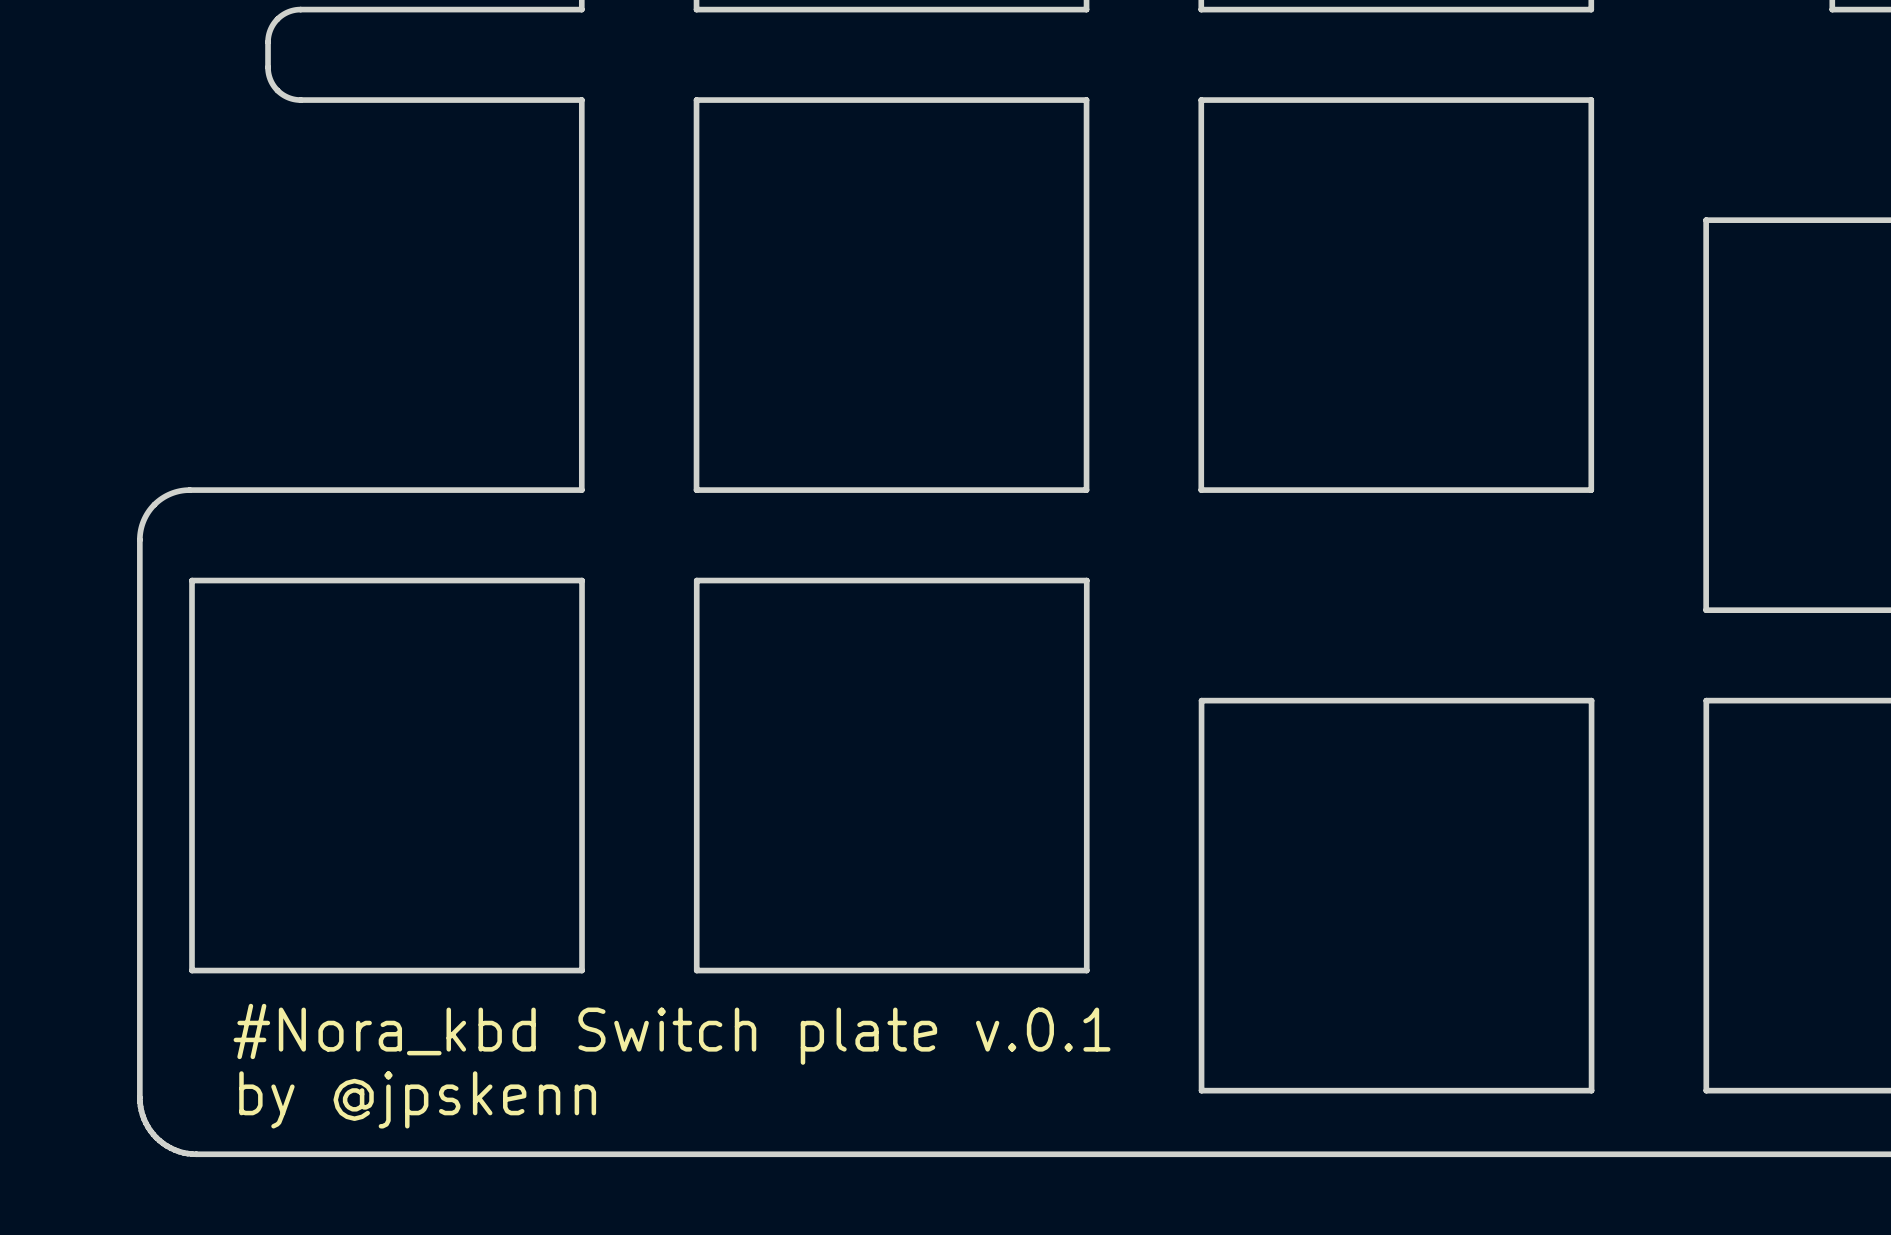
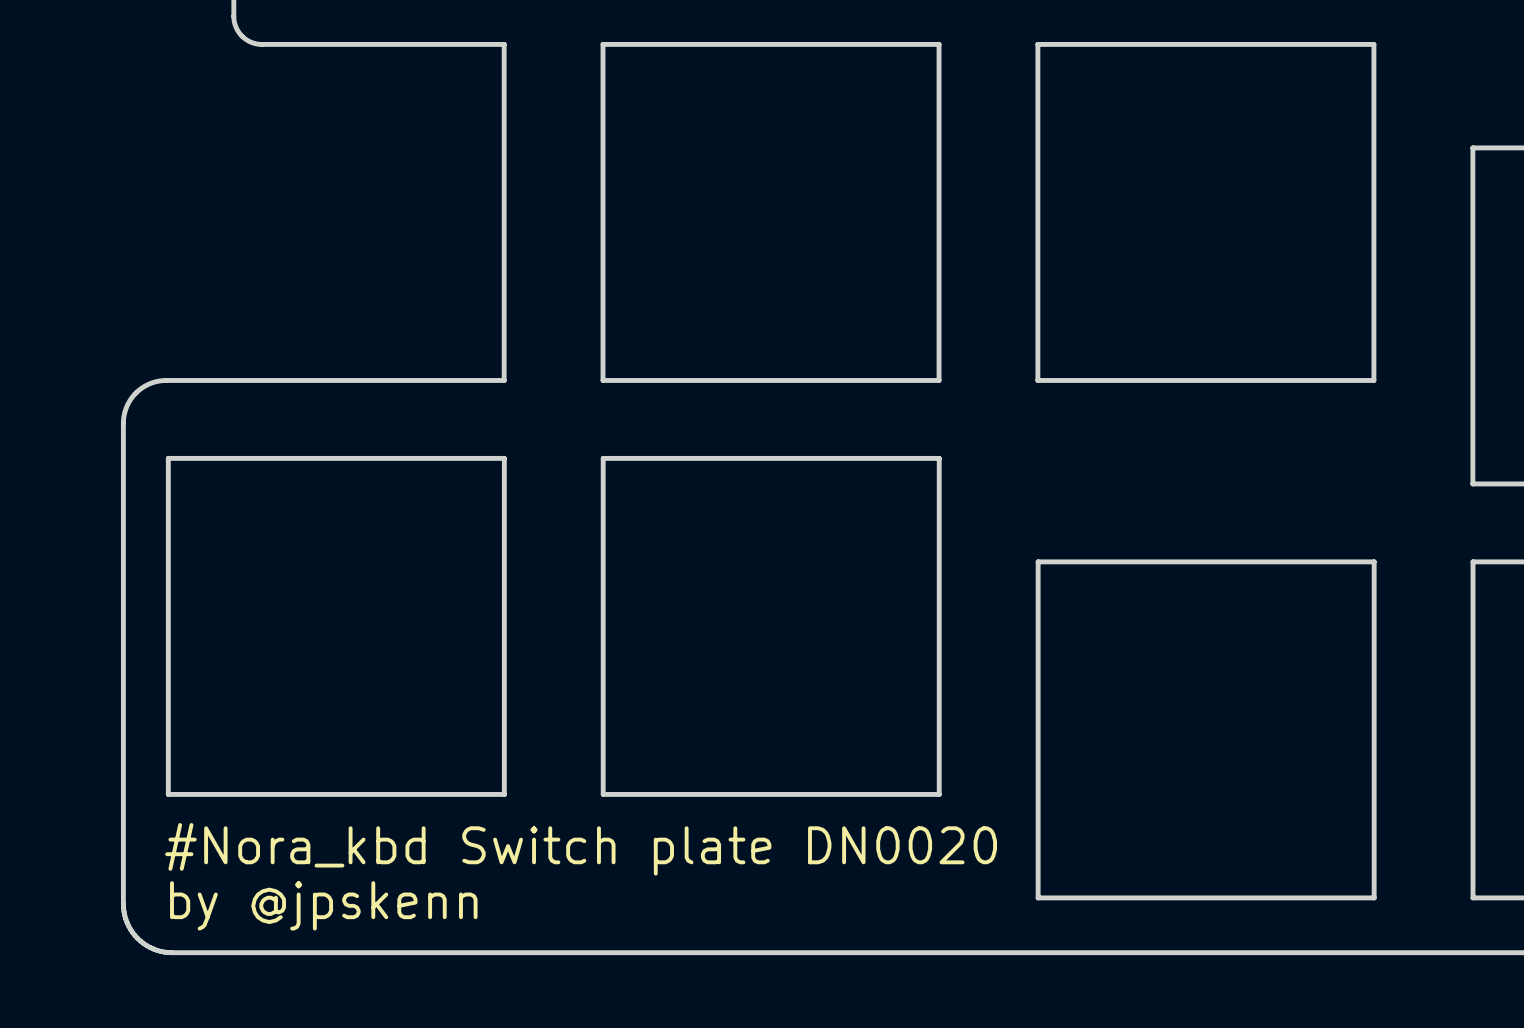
text: #Nora_kbd Switch plate v.0.1 (672, 1034) -> #Nora_kbd Switch plate DN0020 (581, 849)
text position: by @jpskenn (417, 1099) -> by @jpskenn (323, 905)

